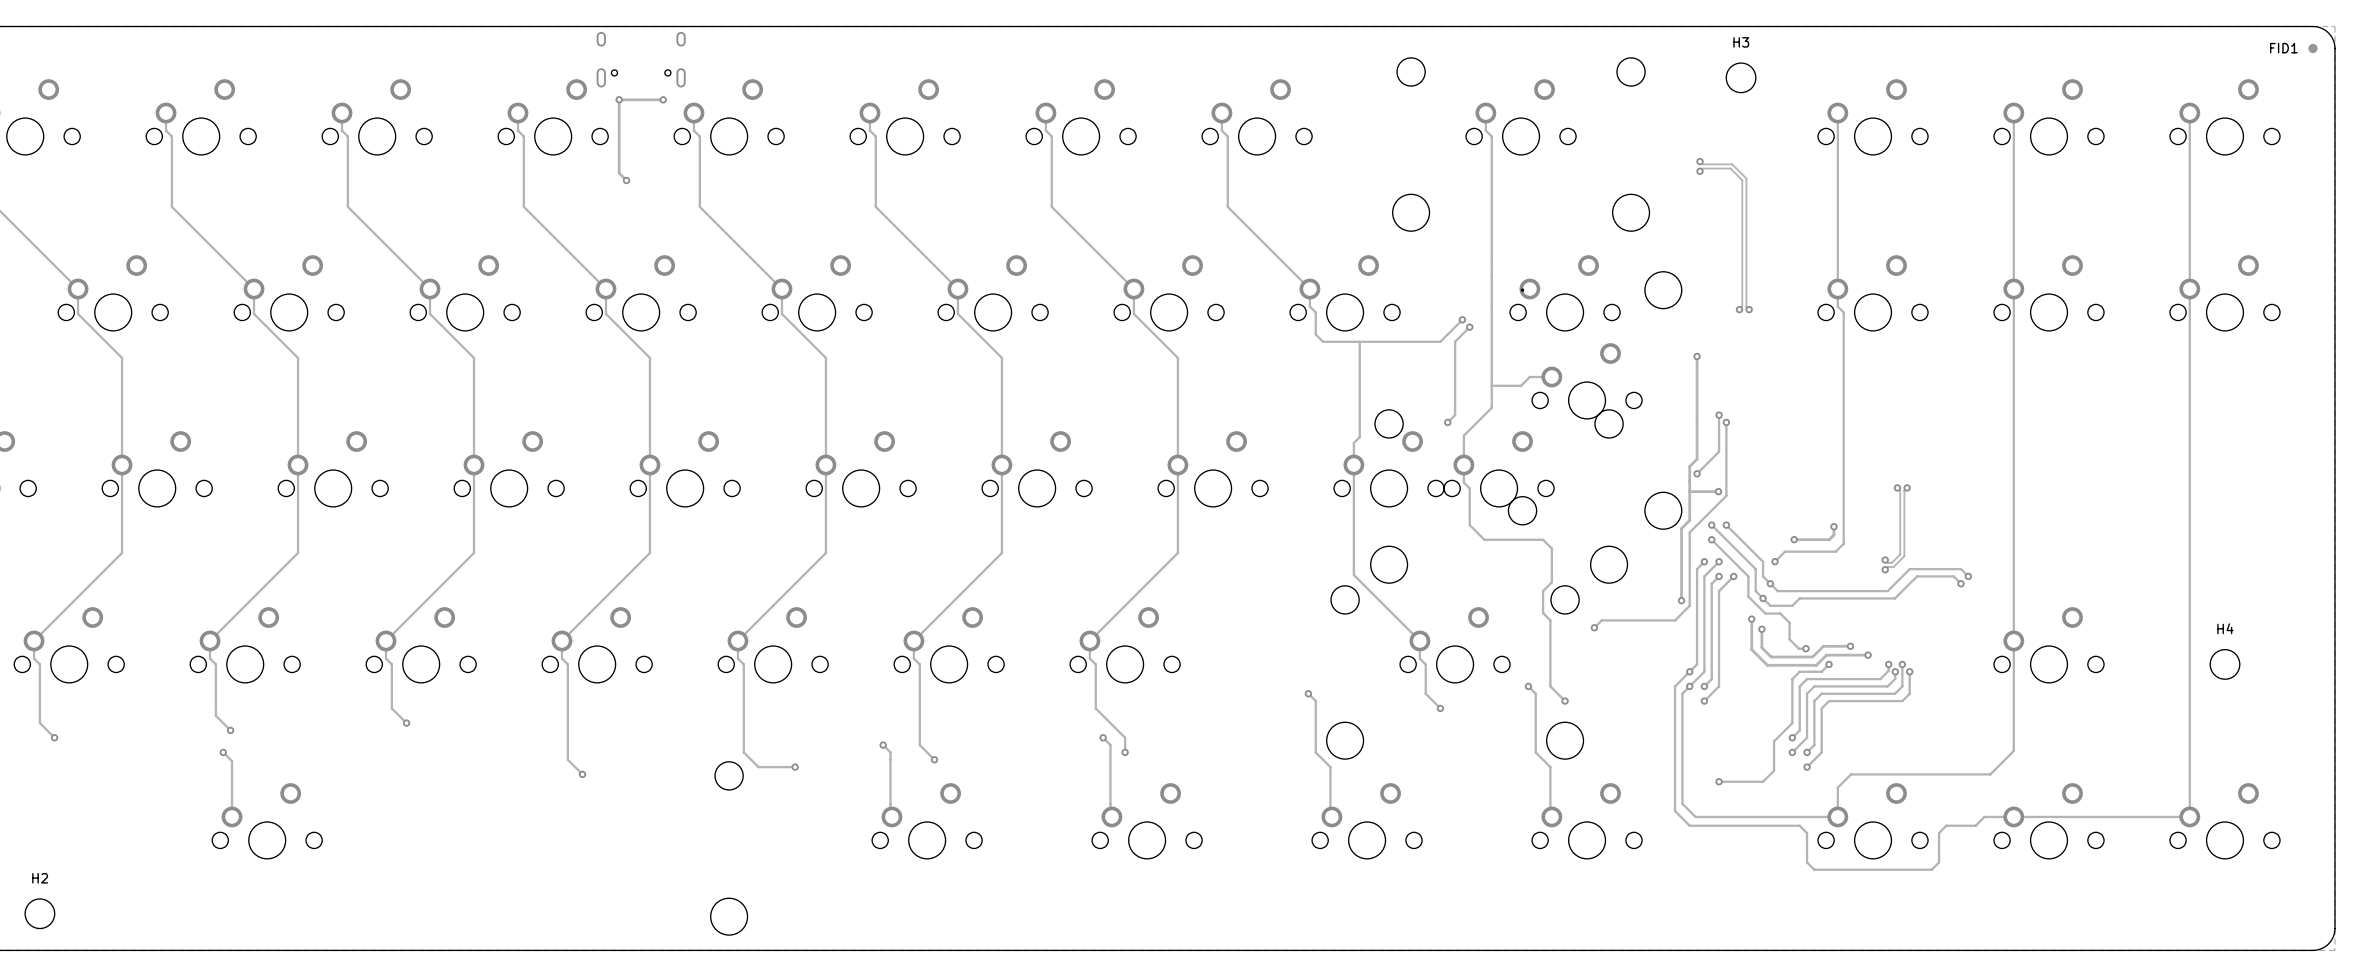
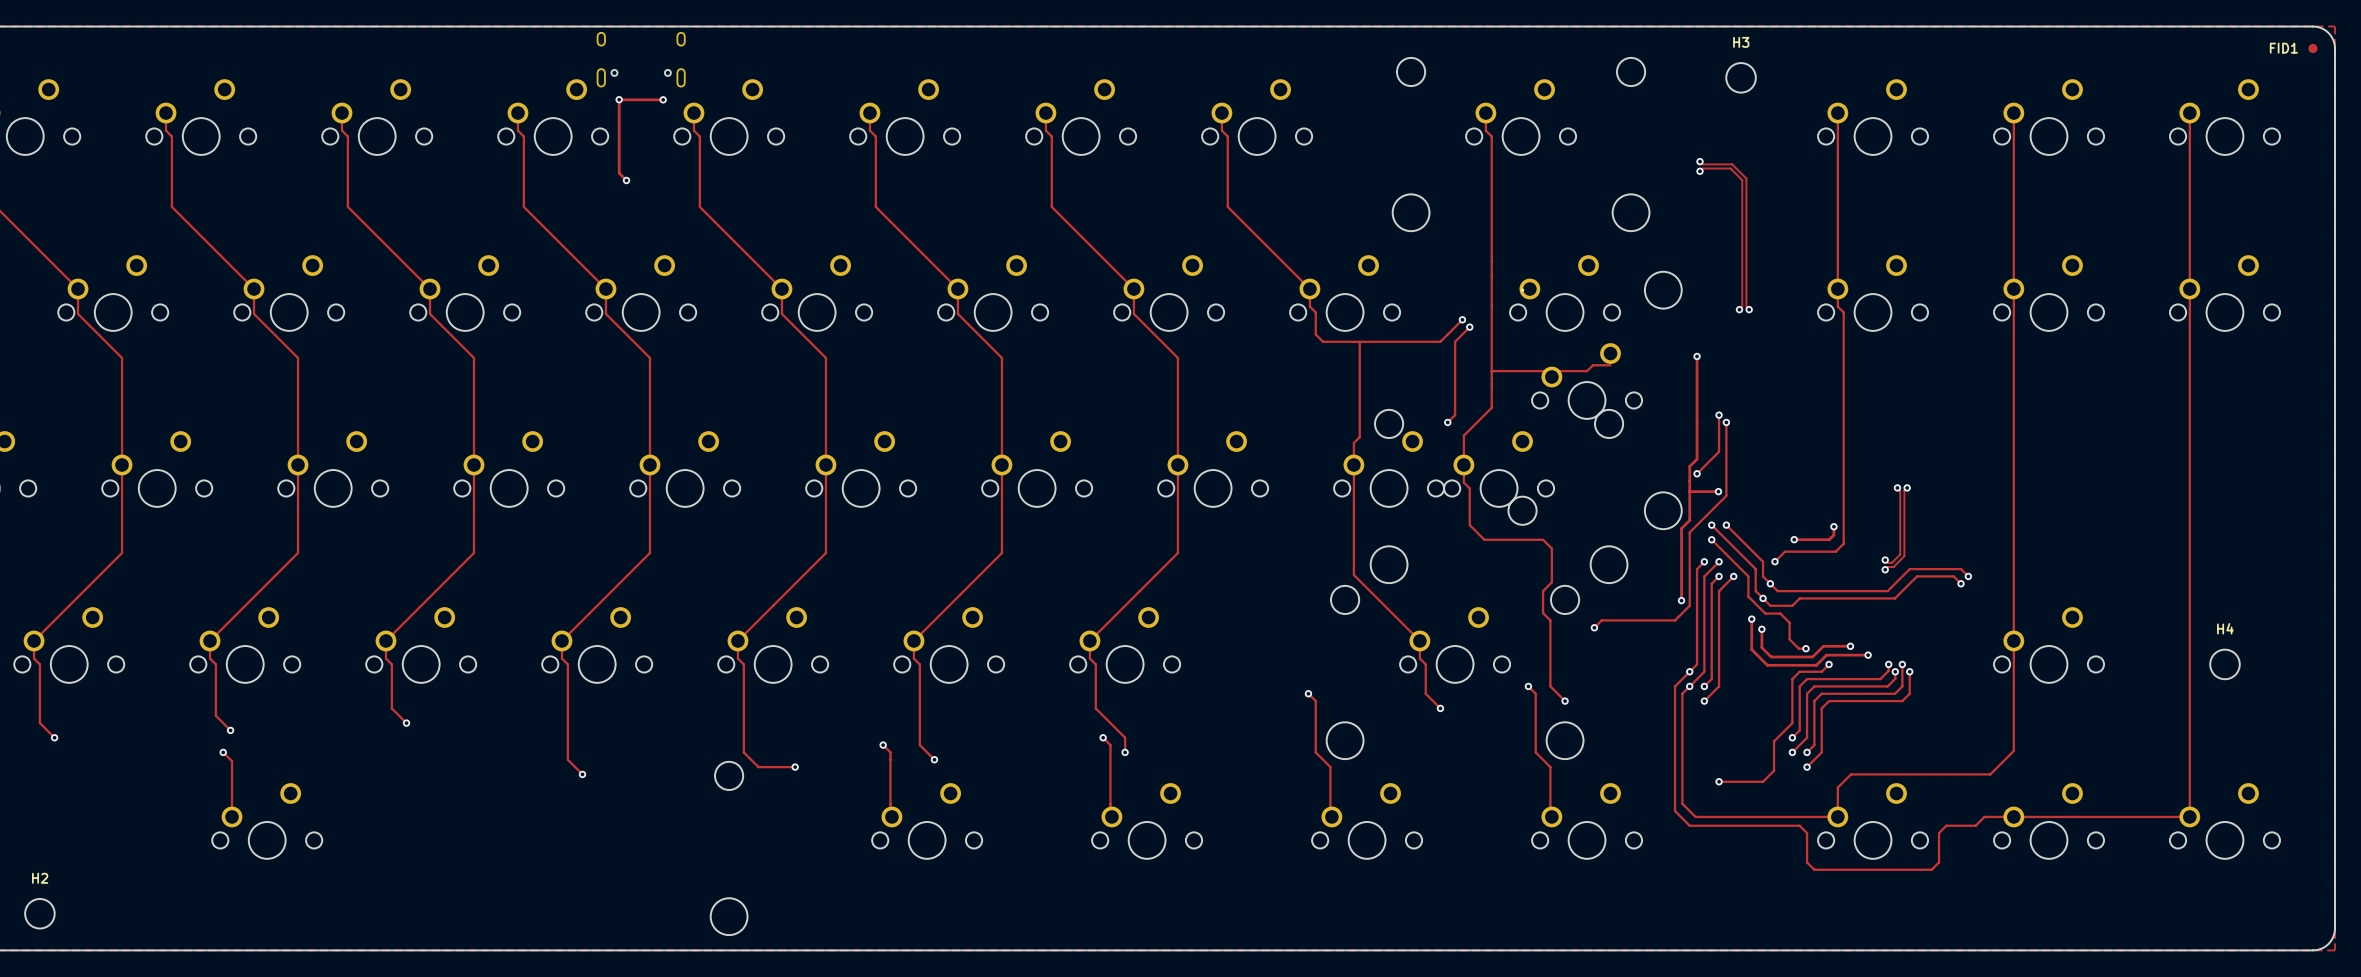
track: none -> (1610, 365) (1592, 365) (1587, 371) (1491, 371)
track: (1551, 377) (1529, 377) (1521, 385) (1491, 385) -> none

